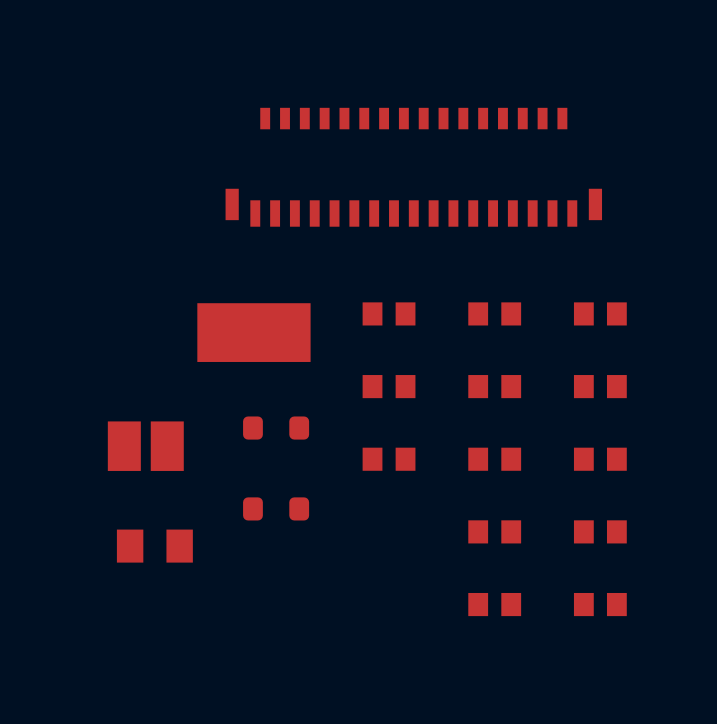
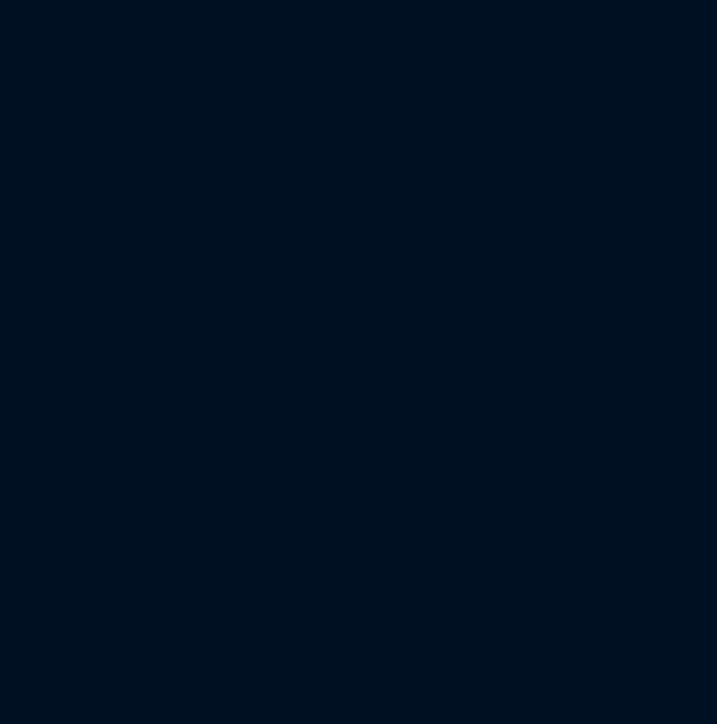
part: (413, 167) -> none
part: (389, 313) -> none
part: (494, 313) -> none
part: (600, 313) -> none
part: (253, 332) -> none
part: (389, 386) -> none
part: (494, 386) -> none
part: (600, 386) -> none
part: (276, 428) -> none
part: (145, 446) -> none
part: (389, 459) -> none
part: (494, 459) -> none
part: (600, 459) -> none
part: (276, 508) -> none
part: (494, 531) -> none
part: (600, 531) -> none
part: (154, 546) -> none
part: (494, 604) -> none
part: (600, 604) -> none

